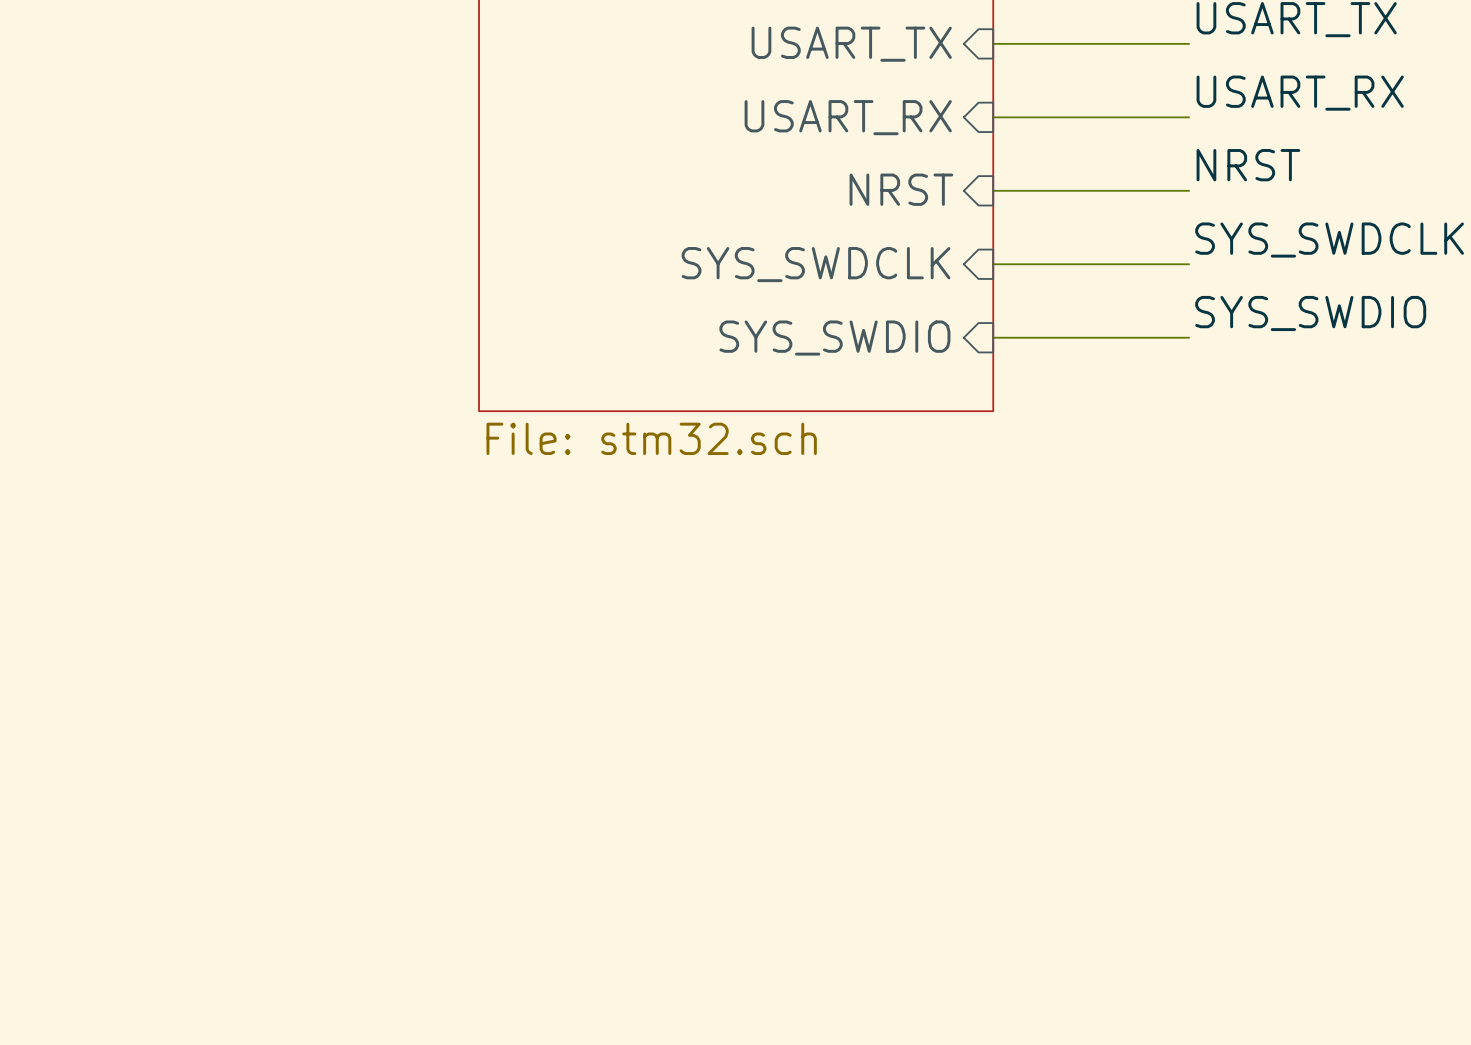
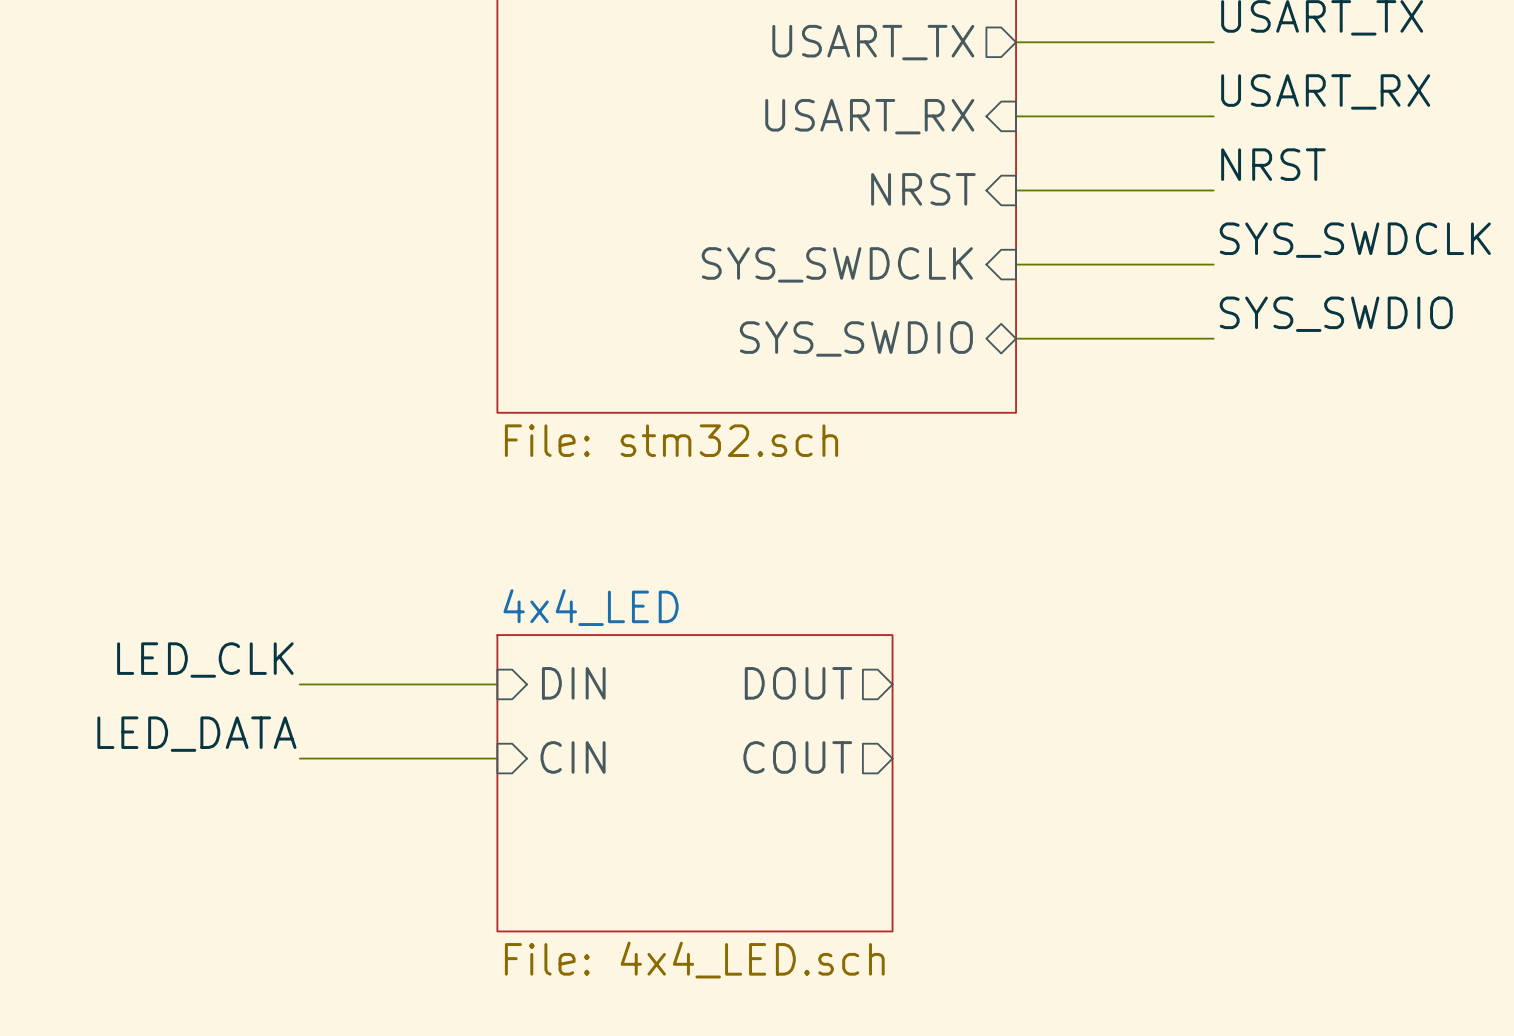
sheet pin shape: input (851, 44) -> output (873, 42)
sheet pin shape: input (834, 338) -> bidirectional (856, 338)
label: none -> LED_CLK (205, 660)
sheet pin: none -> DIN (573, 683)
sheet pin: none -> DOUT (798, 683)
wire: none -> (299, 684) (497, 684)
label: none -> LED_DATA (196, 734)
sheet pin: none -> CIN (573, 757)
sheet pin: none -> COUT (797, 757)
wire: none -> (299, 758) (497, 758)
sheet 4x4_LED: none -> File: 4x4_LED.sch (694, 783)

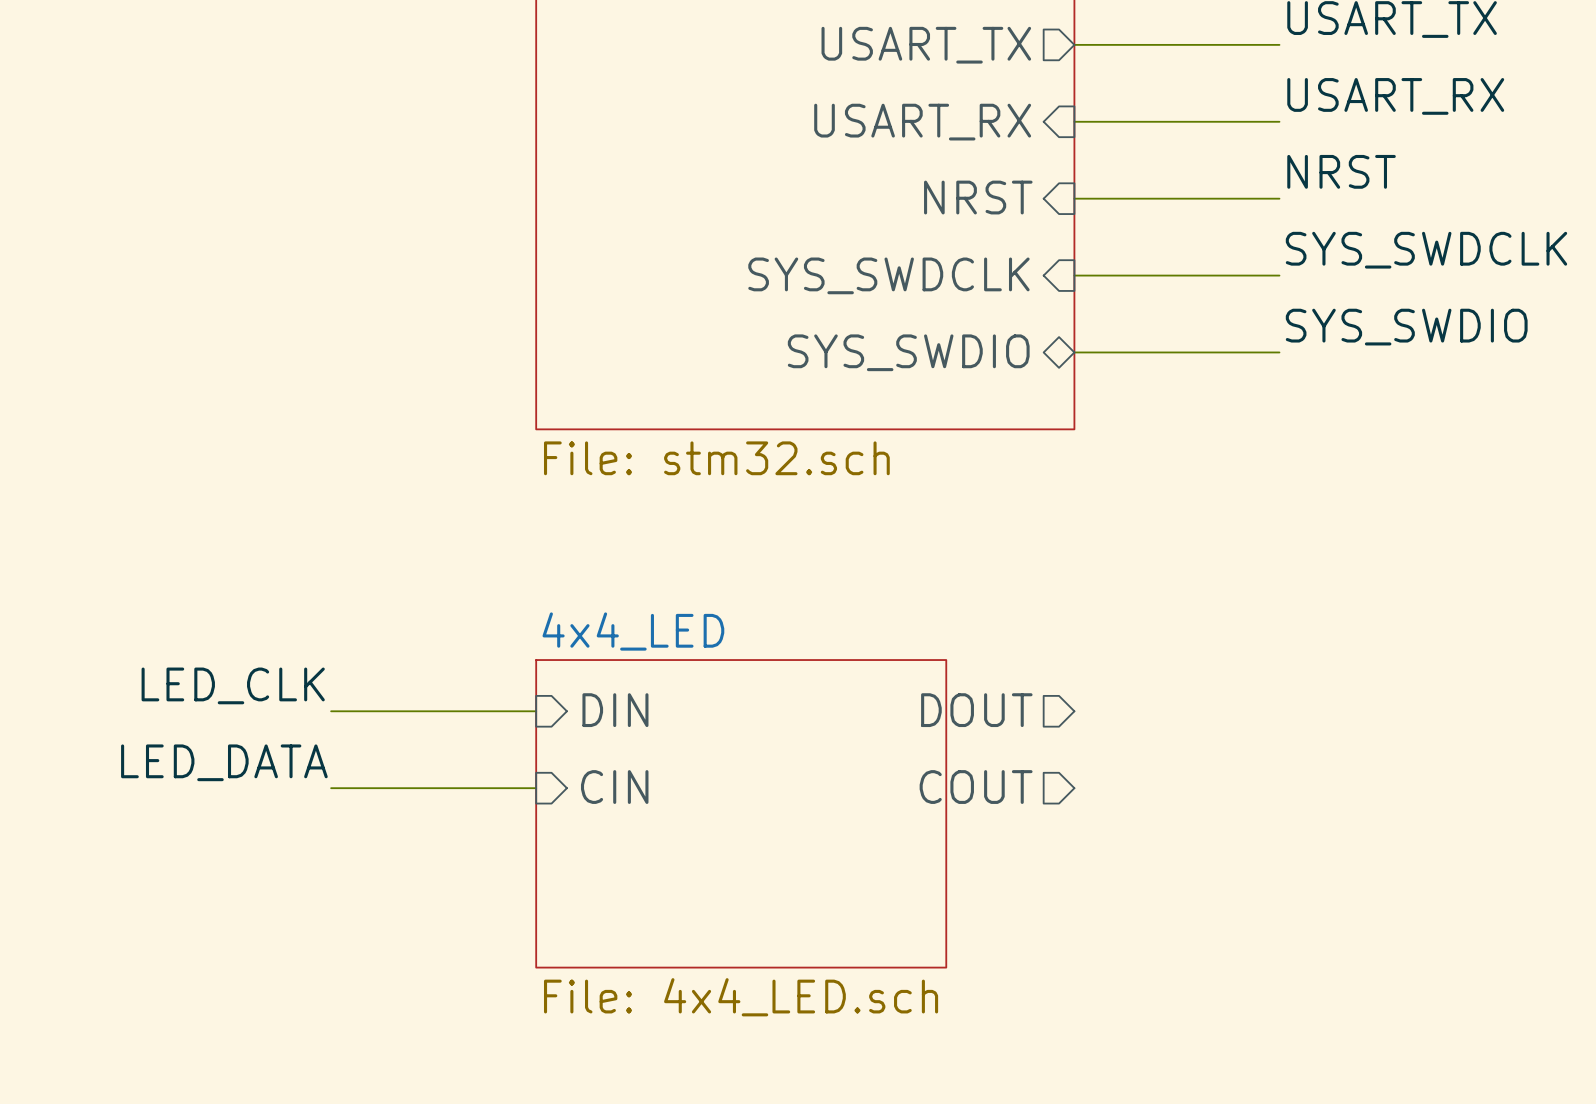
sheet pin position: DOUT (798, 683) -> DOUT (976, 710)
sheet pin position: COUT (797, 757) -> COUT (976, 787)

